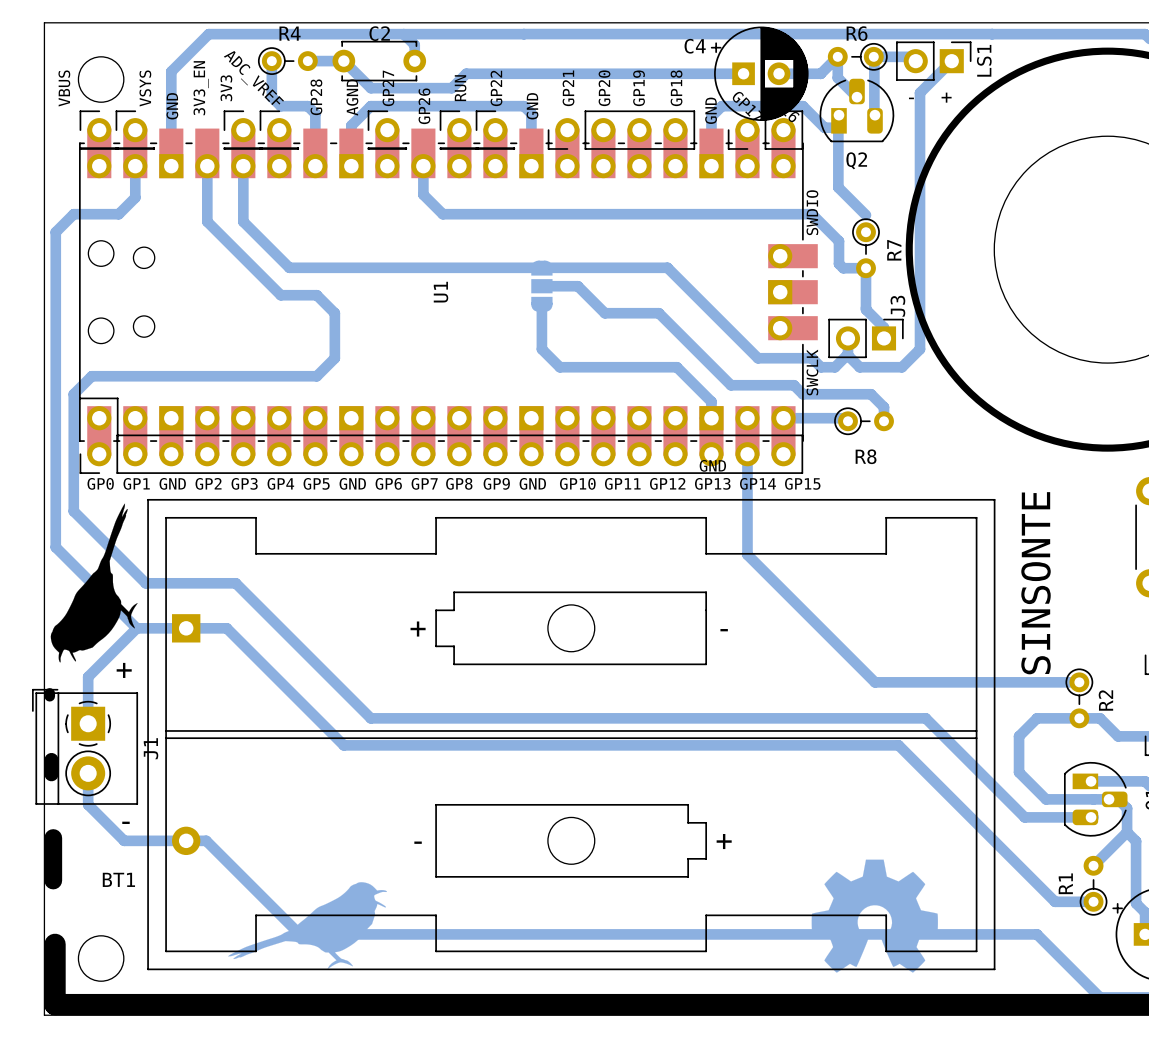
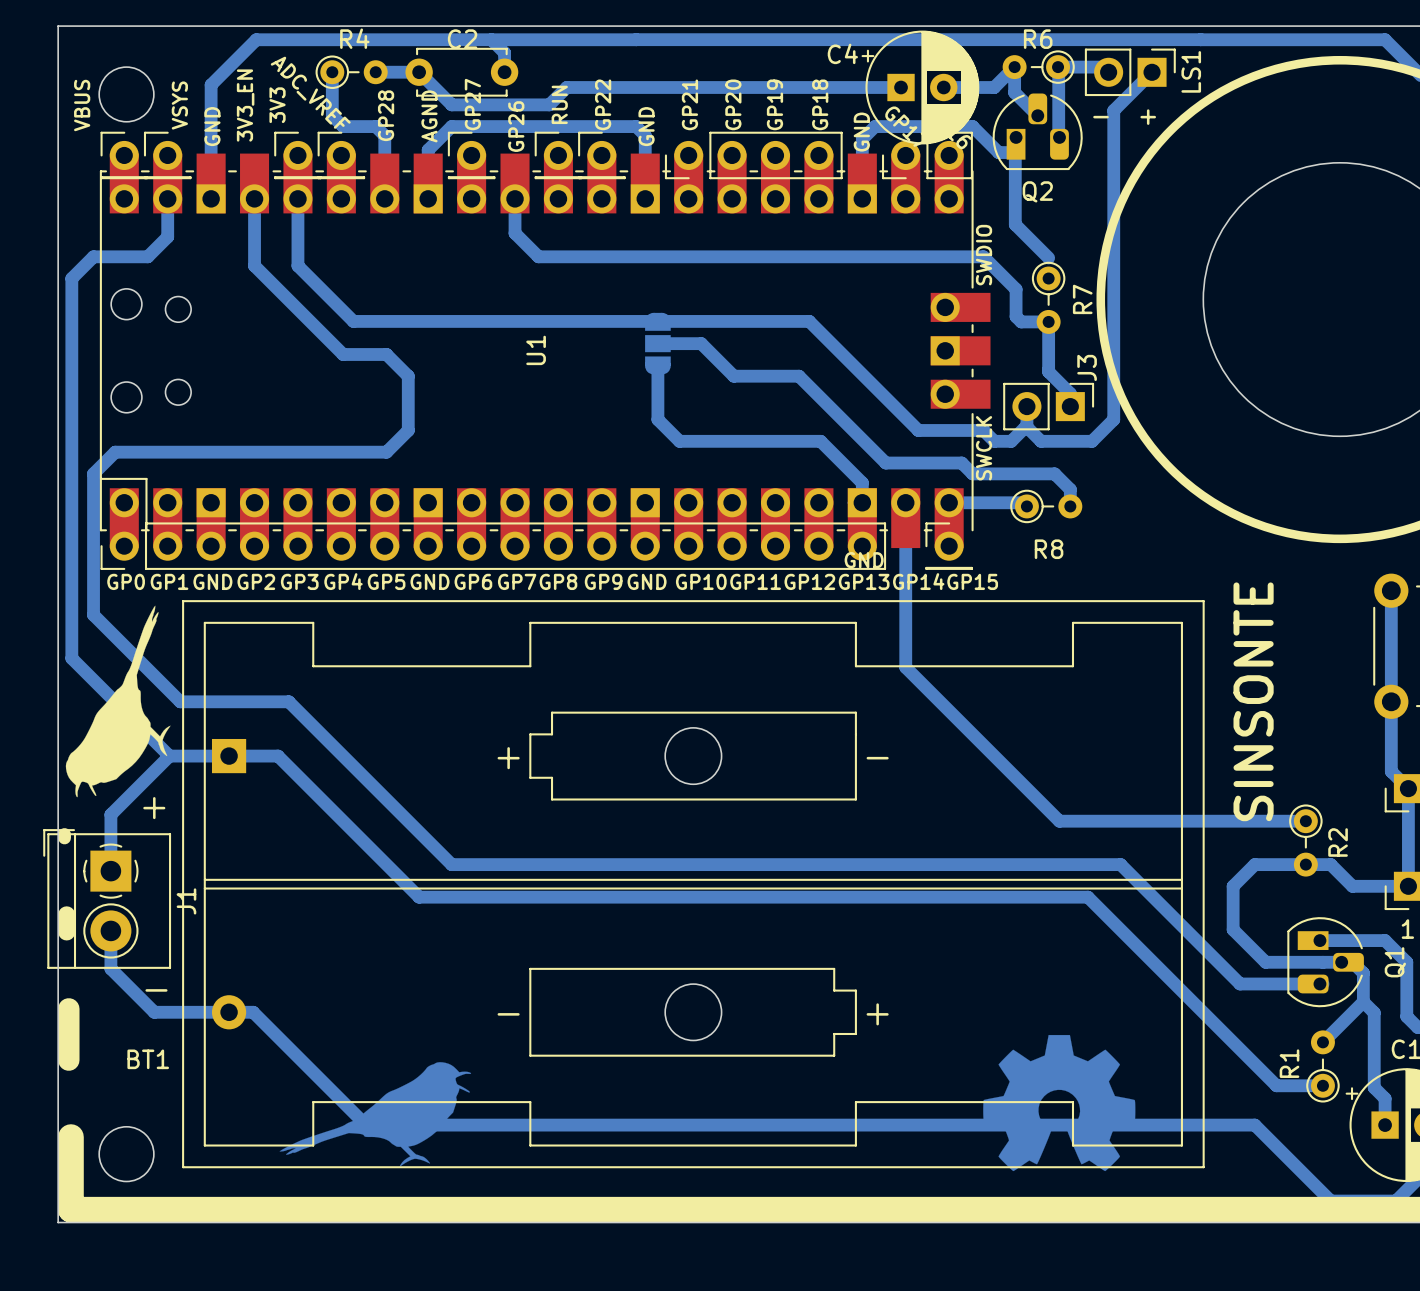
part: none -> (493, 546)
part: (441, 454) -> none
part: none -> (949, 546)

